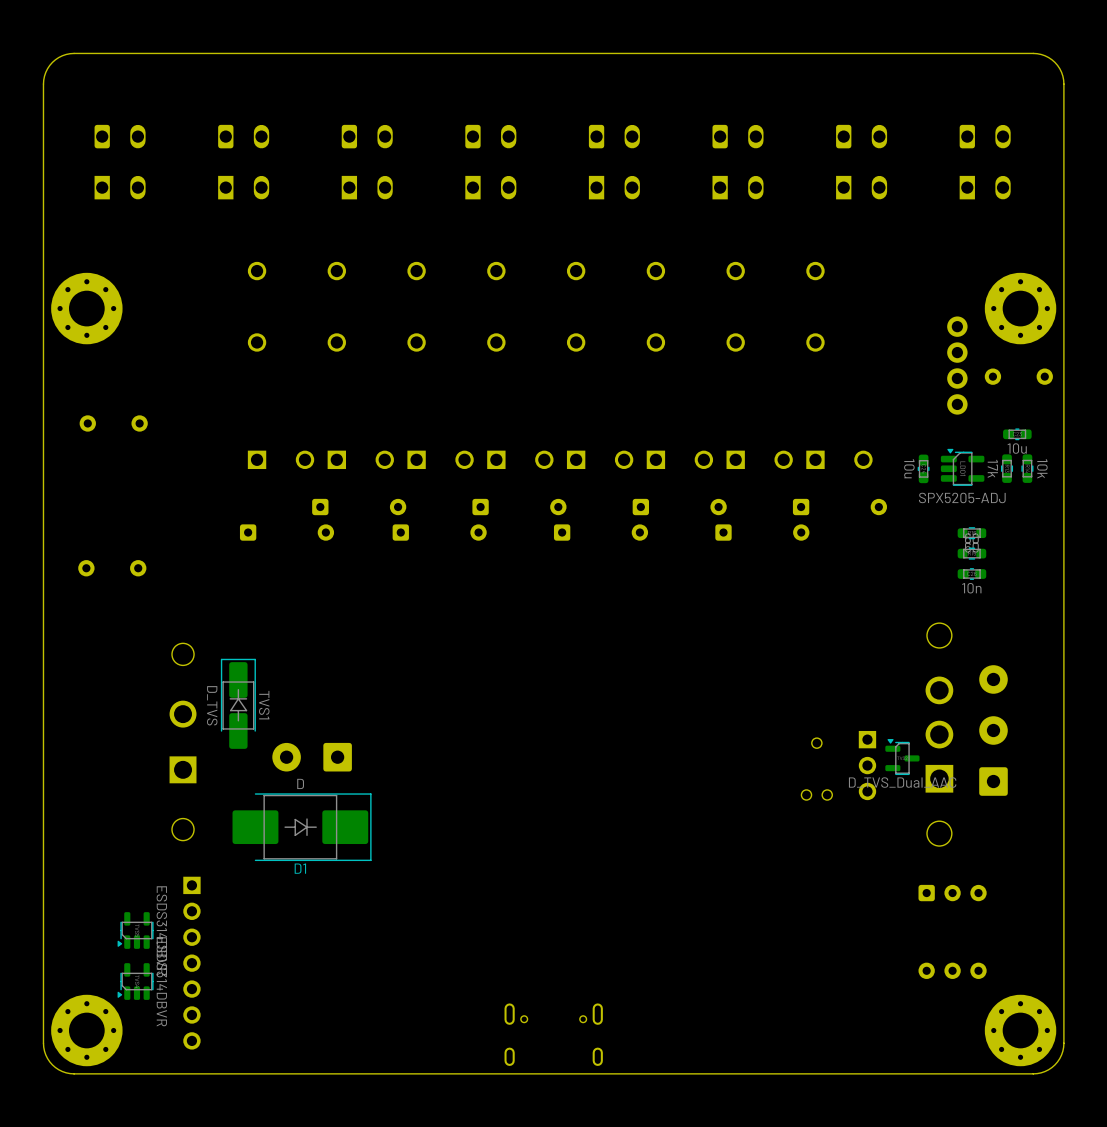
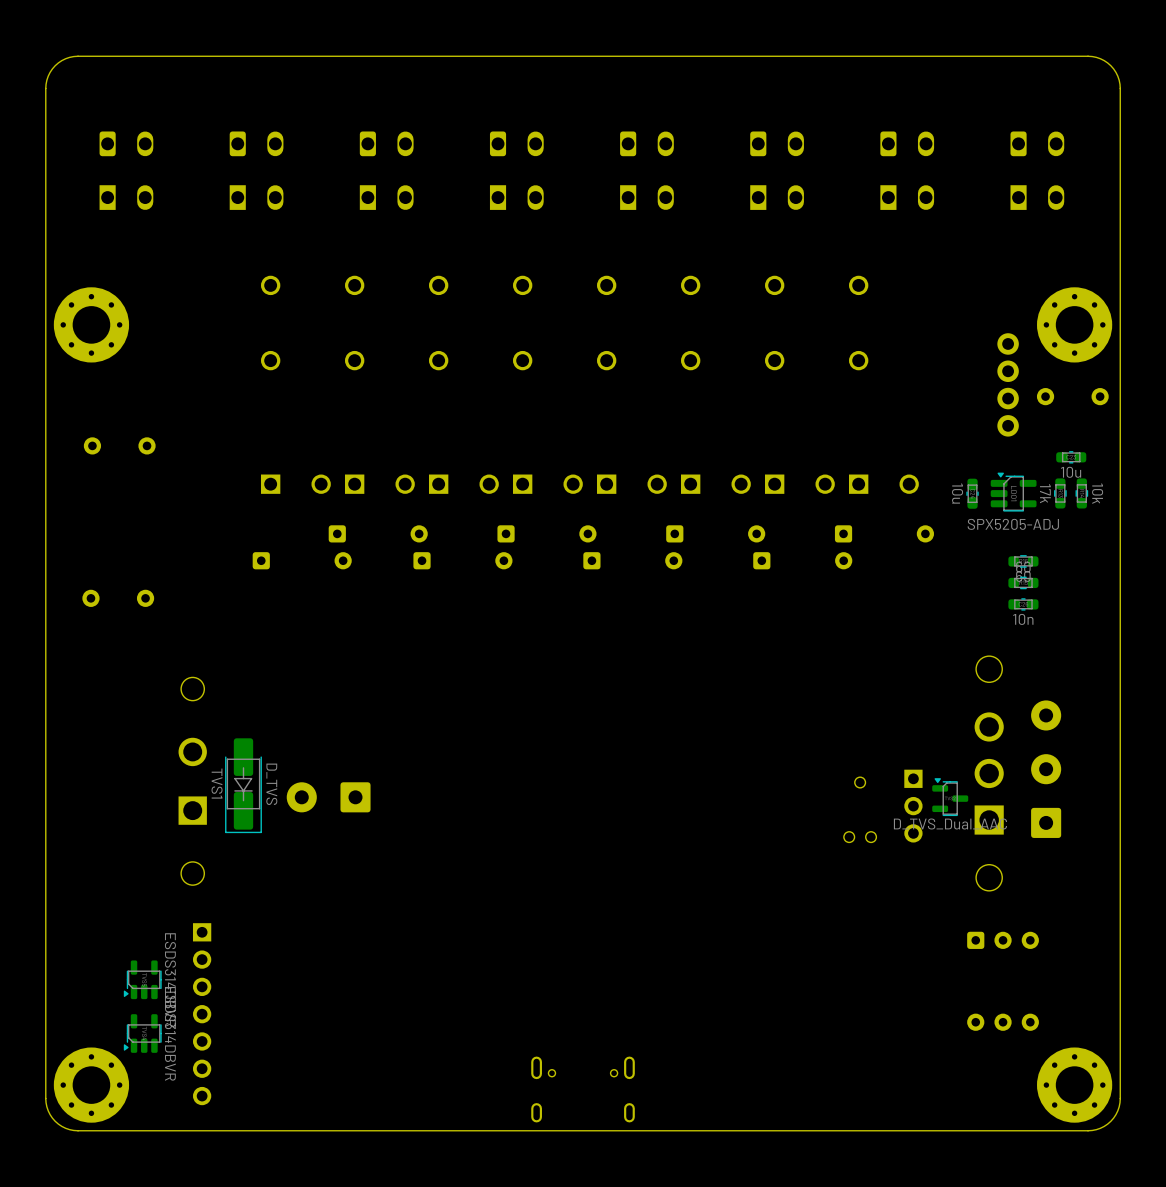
TVS1 rotation: 0° (238, 703) -> 180° (243, 785)
D1: D (302, 827) -> none

